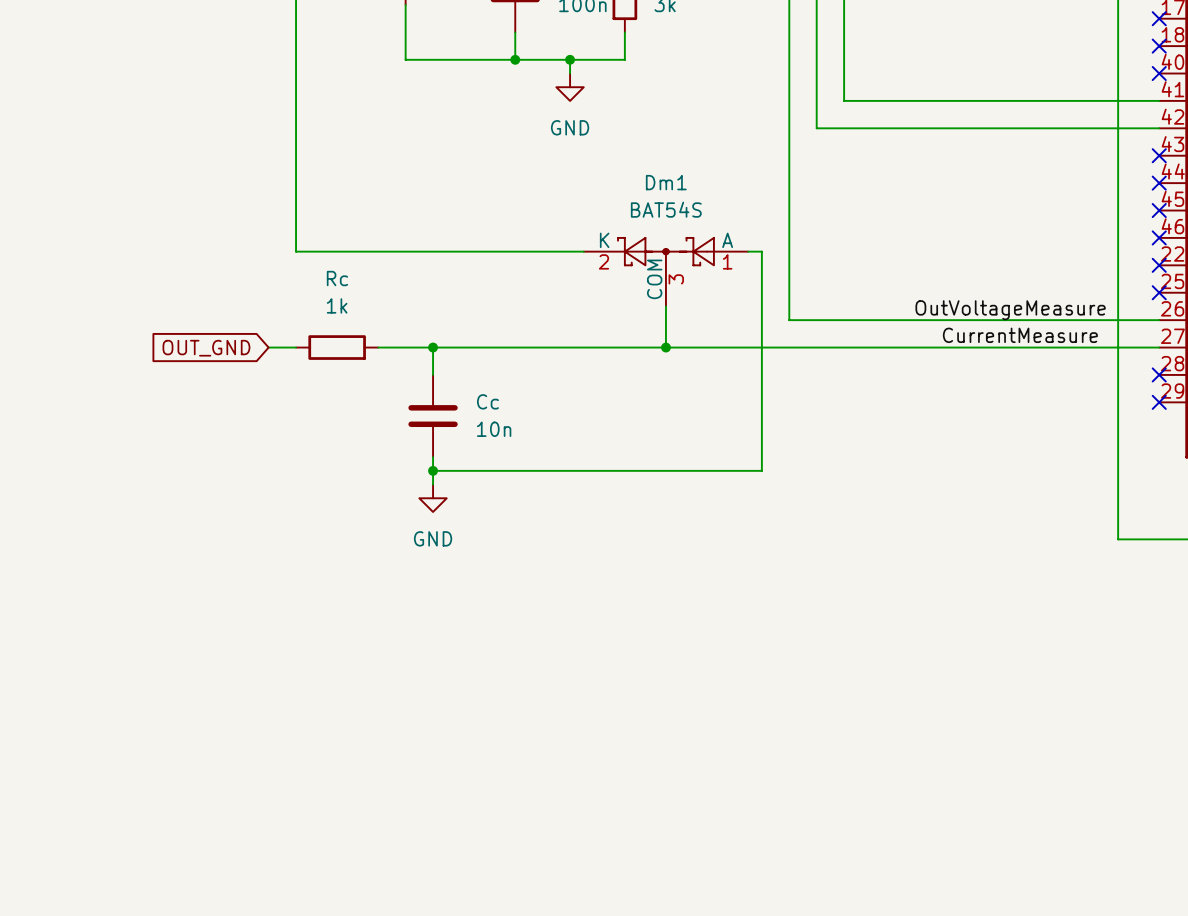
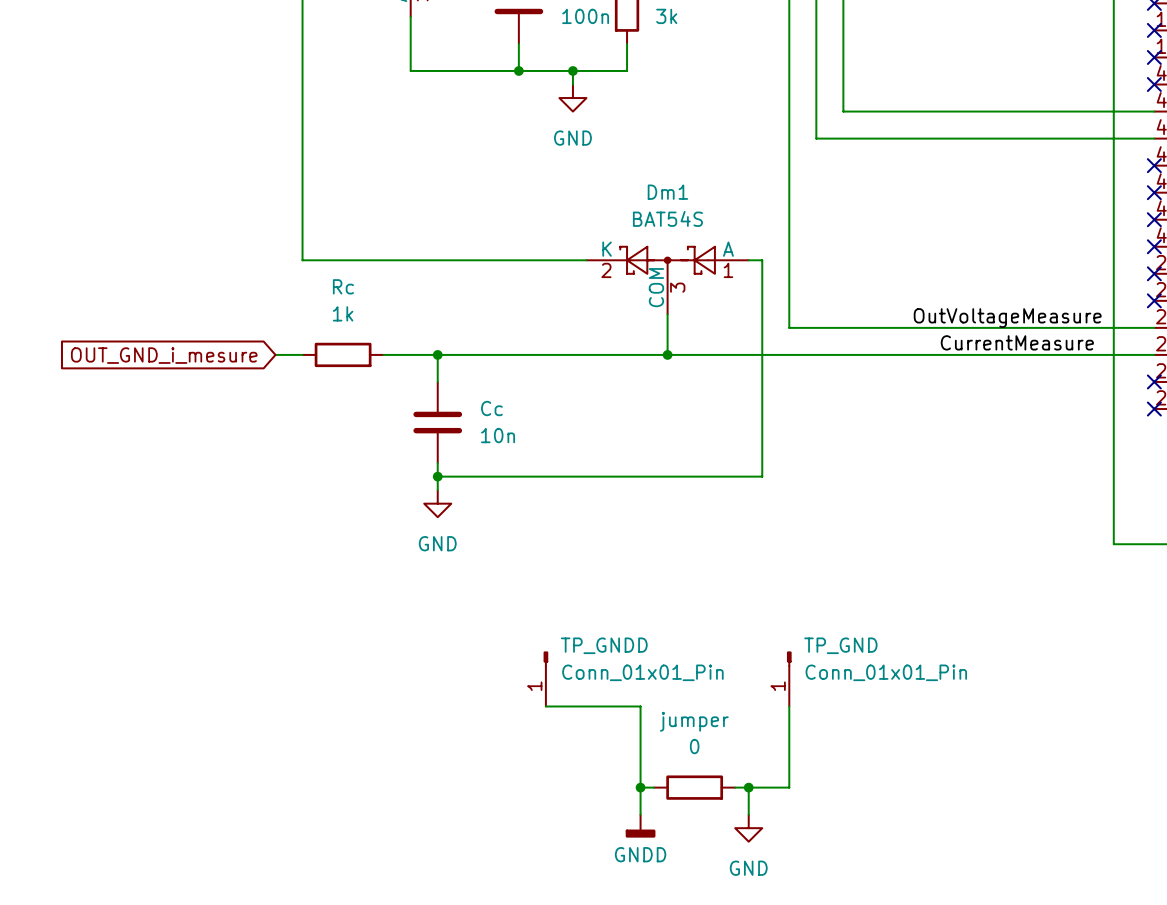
global label: OUT_GND (206, 348) -> OUT_GND_i_mesure (164, 355)
TP_GNDD: none -> Conn_01x01_Pin (545, 679)
TP_GND: none -> Conn_01x01_Pin (789, 679)
wire: none -> (545, 706) (640, 706) (640, 814)
wire: none -> (789, 706) (789, 787) (735, 787)
wire: none -> (640, 787) (654, 787)
junction: none -> (640, 787)
jumper: none -> 0 (694, 787)
wire: none -> (748, 787) (748, 814)
junction: none -> (748, 787)
power symbol: none -> GNDD (640, 826)
power symbol: none -> GND (748, 828)

